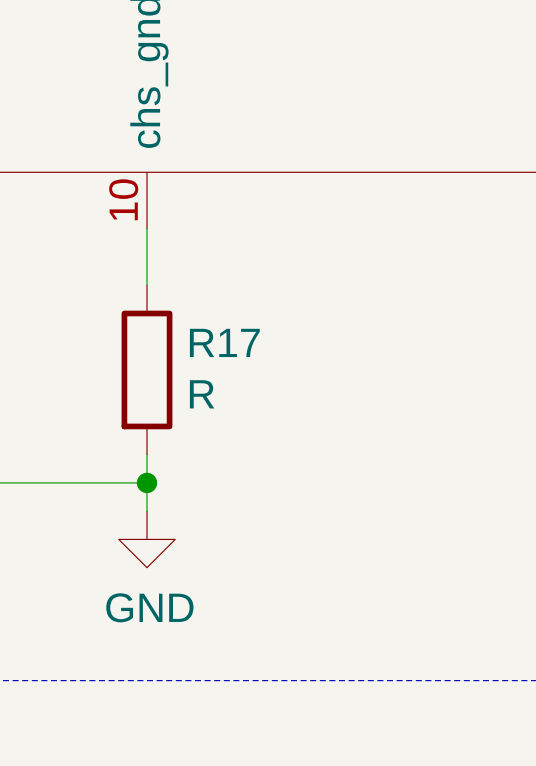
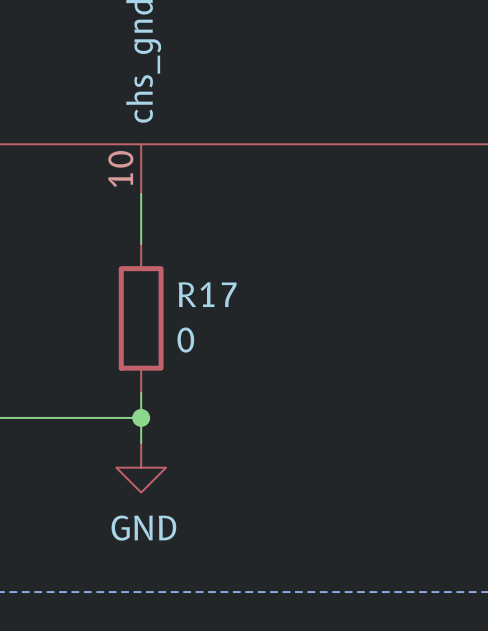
R17 value: R (202, 394) -> 0 (185, 340)

